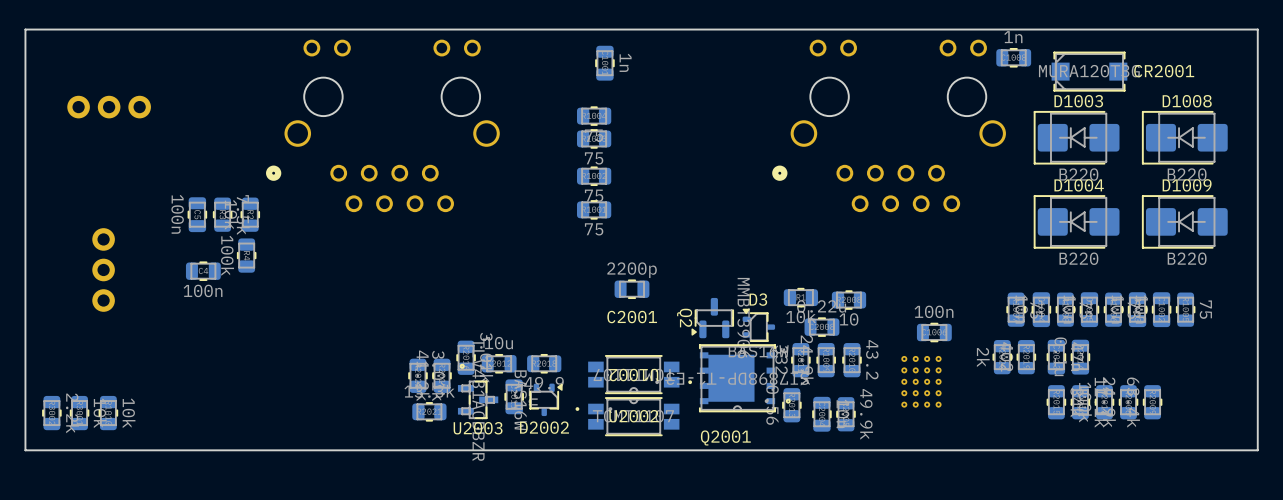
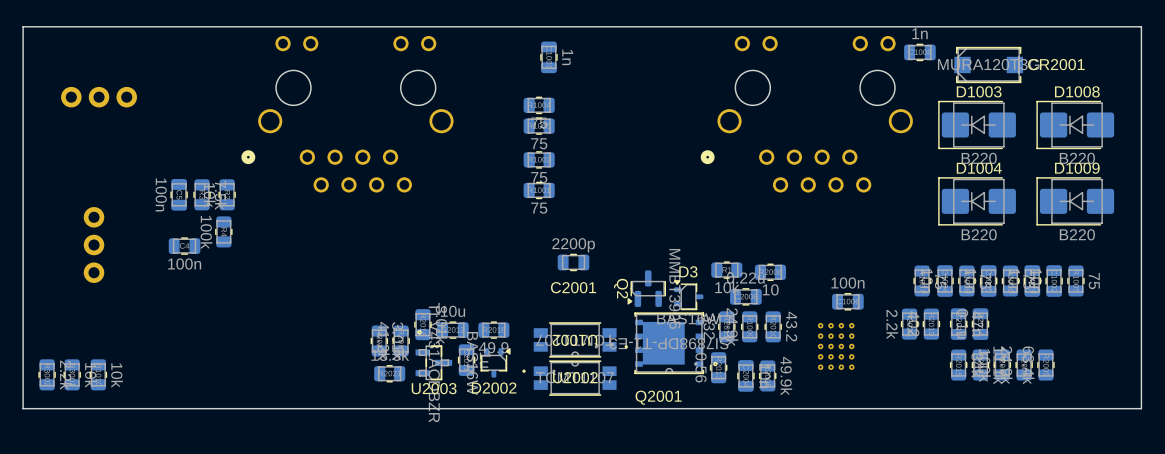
part value: 2k (983, 357) -> 2.2k (892, 324)

